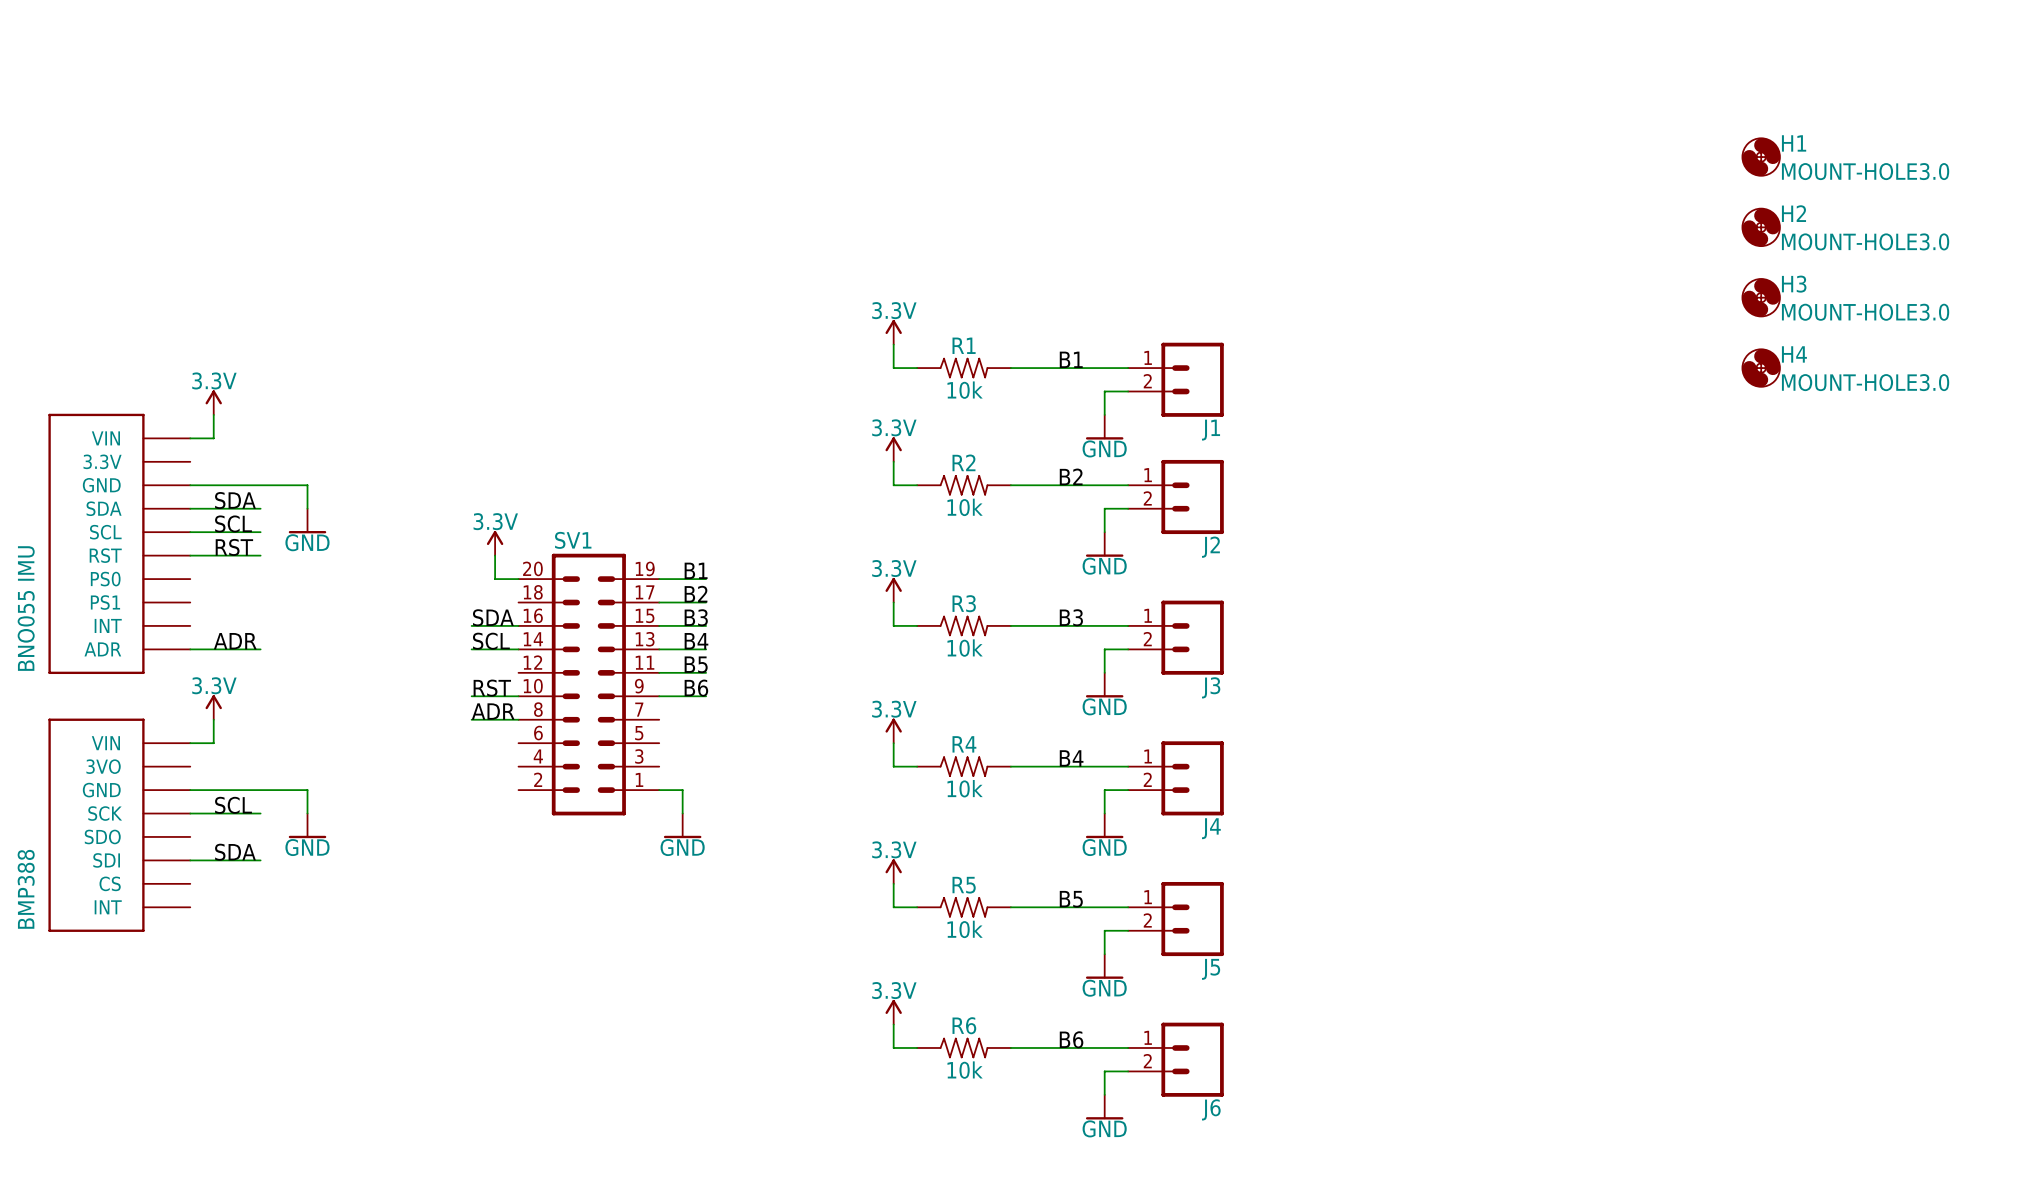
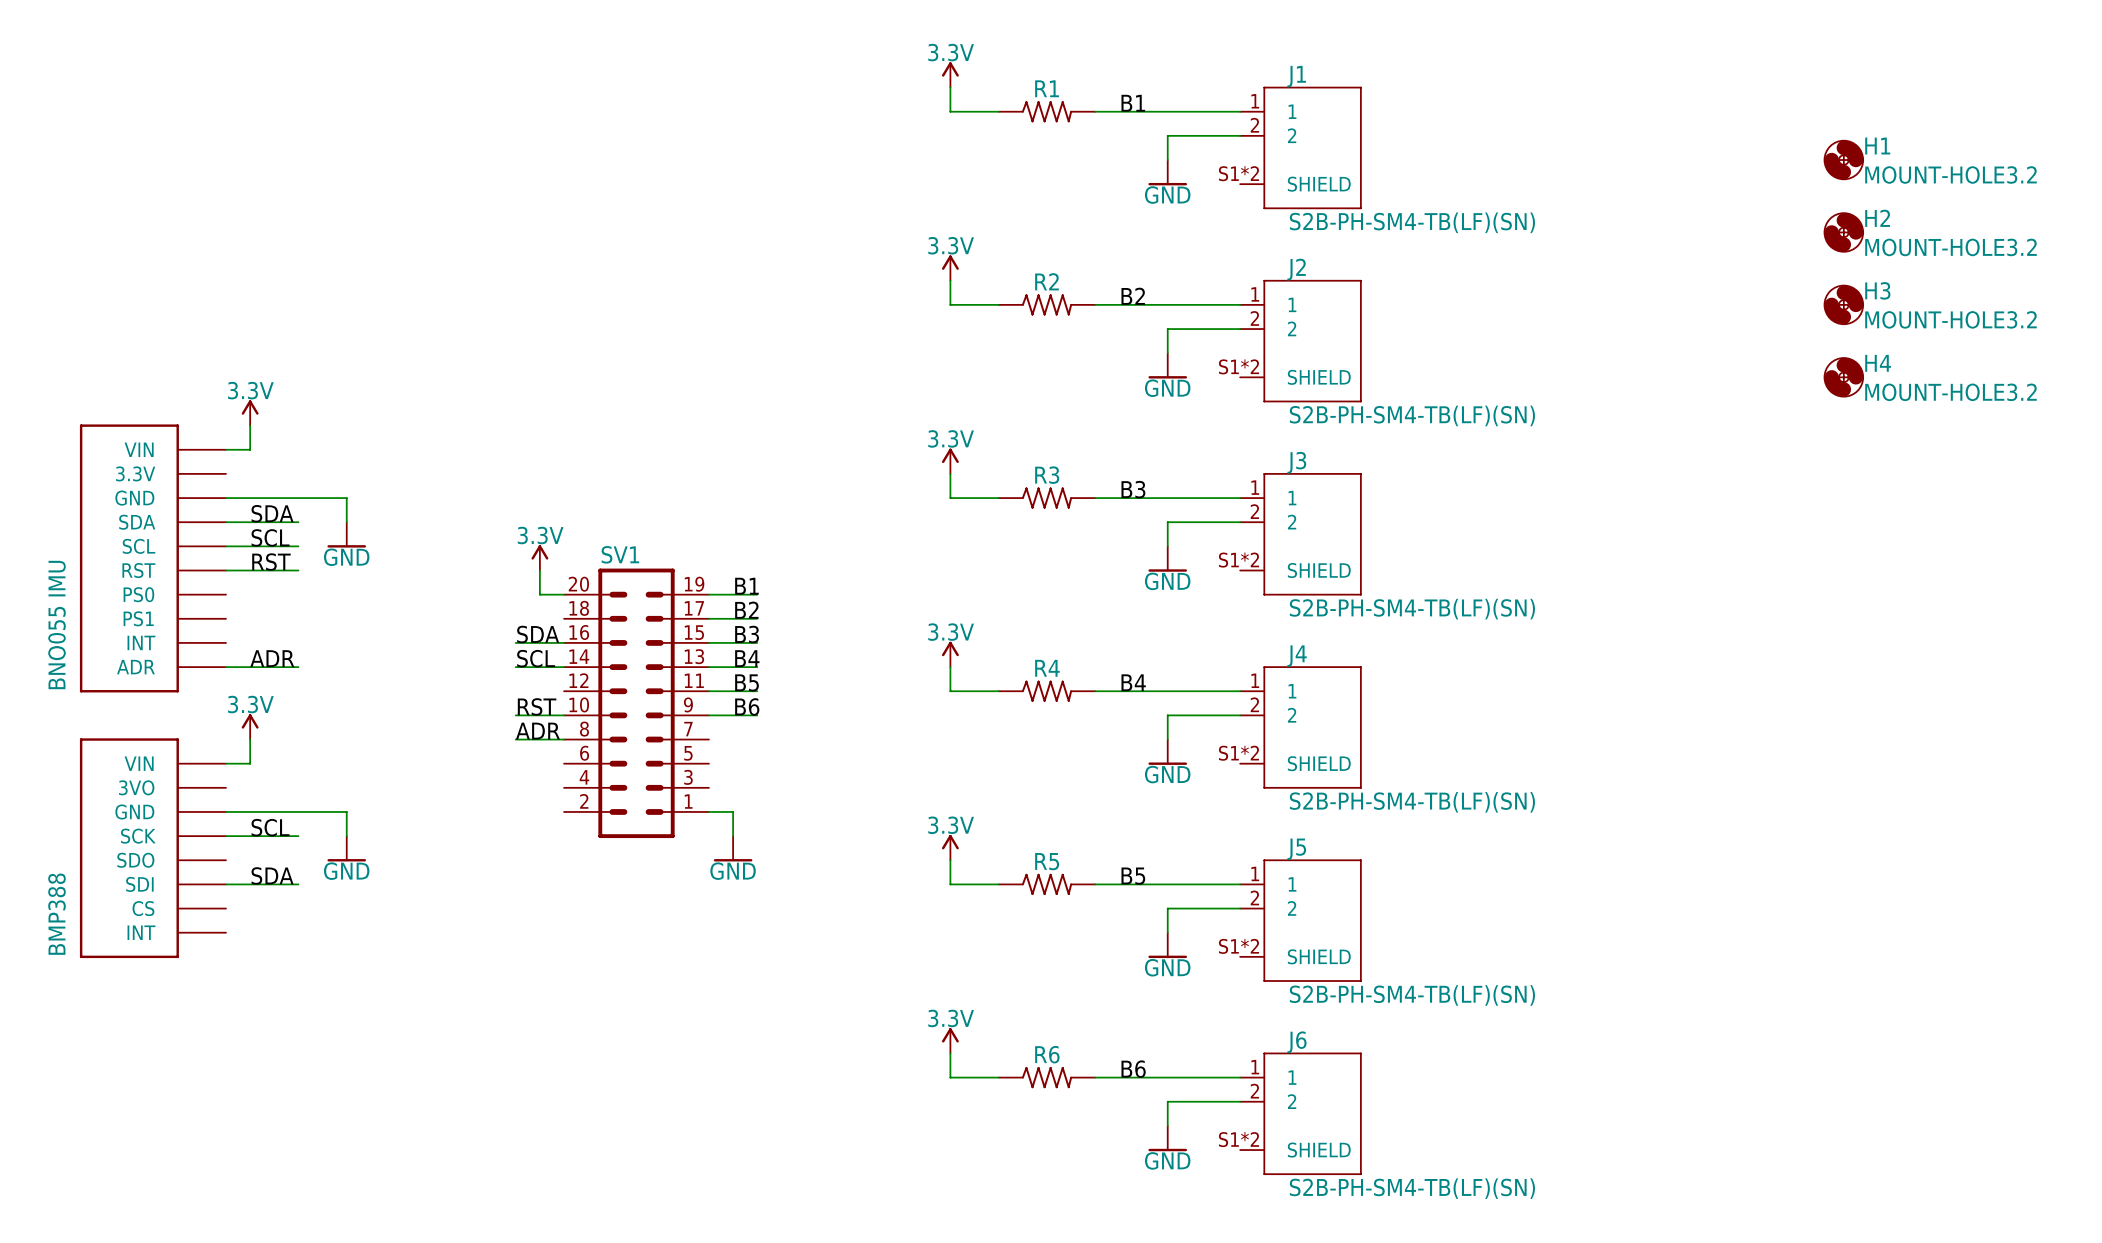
power symbol: none -> 3.3V (950, 74)
wire: none -> (950, 87) (950, 111) (998, 111)
label: none -> B1 (1133, 103)
wire: none -> (1095, 111) (1240, 111)
wire: none -> (1240, 135) (1167, 135) (1167, 160)
power symbol: none -> GND (1167, 172)
H1 value: MOUNT-HOLE3.0 (1865, 171) -> MOUNT-HOLE3.2 (1950, 175)
J1 value: none -> S2B-PH-SM4-TB(LF)(SN) (1412, 222)
H2 value: MOUNT-HOLE3.0 (1865, 241) -> MOUNT-HOLE3.2 (1950, 247)
wire: none -> (950, 280) (950, 304) (998, 304)
label: none -> B2 (1133, 296)
wire: none -> (1095, 304) (1240, 304)
H3 value: MOUNT-HOLE3.0 (1865, 312) -> MOUNT-HOLE3.2 (1950, 319)
wire: none -> (1240, 329) (1167, 329) (1167, 353)
power symbol position: 3.3V (893, 332) -> 3.3V (950, 268)
J1 symbol: [1128, 342, 1224, 417] -> [1240, 86, 1362, 210]
wire: (893, 344) (893, 368) (917, 368) -> none
R1 symbol: [917, 357, 1011, 379] -> [998, 101, 1096, 123]
label: B1 (1071, 359) -> none
wire: (1010, 368) (1128, 368) -> none
H4 value: MOUNT-HOLE3.0 (1865, 382) -> MOUNT-HOLE3.2 (1950, 392)
R1 value: 10k (965, 390) -> none
wire: (1128, 391) (1104, 391) (1104, 414) -> none
J2 value: none -> S2B-PH-SM4-TB(LF)(SN) (1412, 415)
power symbol position: GND (1104, 427) -> GND (1167, 365)
J1 name position: J1 (1211, 430) -> J1 (1296, 76)
J2 symbol: [1128, 459, 1224, 535] -> [1240, 280, 1362, 403]
R2 symbol: [917, 475, 1011, 496] -> [998, 294, 1096, 316]
label: B2 (1071, 476) -> B3 (1133, 489)
R2 value: 10k (965, 507) -> none
J2 name position: J2 (1210, 547) -> J2 (1296, 269)
power symbol: 3.3V (893, 590) -> none
J3 value: none -> S2B-PH-SM4-TB(LF)(SN) (1412, 609)
J3 symbol: [1128, 600, 1224, 675] -> [1240, 473, 1362, 596]
wire: (893, 602) (893, 625) (917, 625) -> none
R3 symbol: [917, 615, 1011, 637] -> [998, 487, 1096, 509]
label: B3 (1071, 617) -> none
wire: (1010, 625) (1128, 625) -> none
power symbol: none -> 3.3V (950, 654)
R3 value: 10k (965, 648) -> none
wire: none -> (950, 667) (950, 691) (998, 691)
wire: (1128, 649) (1104, 649) (1104, 672) -> none
wire: none -> (1095, 691) (1240, 691)
power symbol: GND (1104, 685) -> none
J3 name position: J3 (1211, 687) -> J3 (1296, 462)
wire: none -> (1240, 715) (1167, 715) (1167, 739)
power symbol: 3.3V (893, 730) -> none
power symbol: none -> GND (1167, 752)
J4 symbol: [1128, 741, 1224, 816] -> [1240, 666, 1362, 789]
wire: (893, 743) (893, 766) (917, 766) -> none
R4 symbol: [917, 756, 1011, 777] -> [998, 680, 1096, 702]
label position: B4 (1071, 758) -> B4 (1133, 682)
wire: (1010, 766) (1128, 766) -> none
J4 value: none -> S2B-PH-SM4-TB(LF)(SN) (1412, 802)
R4 value: 10k (965, 788) -> none
wire: (1128, 790) (1104, 790) (1104, 813) -> none
power symbol: none -> 3.3V (950, 847)
power symbol: GND (1104, 825) -> none
J4 name position: J4 (1211, 828) -> J4 (1297, 656)
wire: none -> (950, 860) (950, 884) (998, 884)
wire: none -> (1095, 884) (1240, 884)
power symbol: 3.3V (893, 871) -> none
J5 symbol: [1128, 881, 1224, 957] -> [1240, 859, 1362, 982]
wire: (893, 883) (893, 907) (917, 907) -> none
wire: none -> (1240, 908) (1167, 908) (1167, 932)
R5 symbol: [917, 897, 1011, 918] -> [998, 873, 1096, 896]
label position: B5 (1071, 899) -> B5 (1133, 876)
wire: (1010, 907) (1128, 907) -> none
power symbol: none -> GND (1167, 945)
R5 value: 10k (965, 929) -> none
wire: (1128, 930) (1104, 930) (1104, 954) -> none
power symbol: GND (1104, 966) -> none
J5 value: none -> S2B-PH-SM4-TB(LF)(SN) (1412, 995)
J5 name position: J5 (1211, 969) -> J5 (1296, 849)
J6 symbol: [1128, 1022, 1224, 1097] -> [1240, 1052, 1362, 1175]
R6 symbol: [917, 1037, 1011, 1059] -> [998, 1066, 1096, 1089]
R6 value: 10k (965, 1070) -> none
J6 name position: J6 (1211, 1109) -> J6 (1296, 1042)
J6 value: none -> S2B-PH-SM4-TB(LF)(SN) (1412, 1188)

